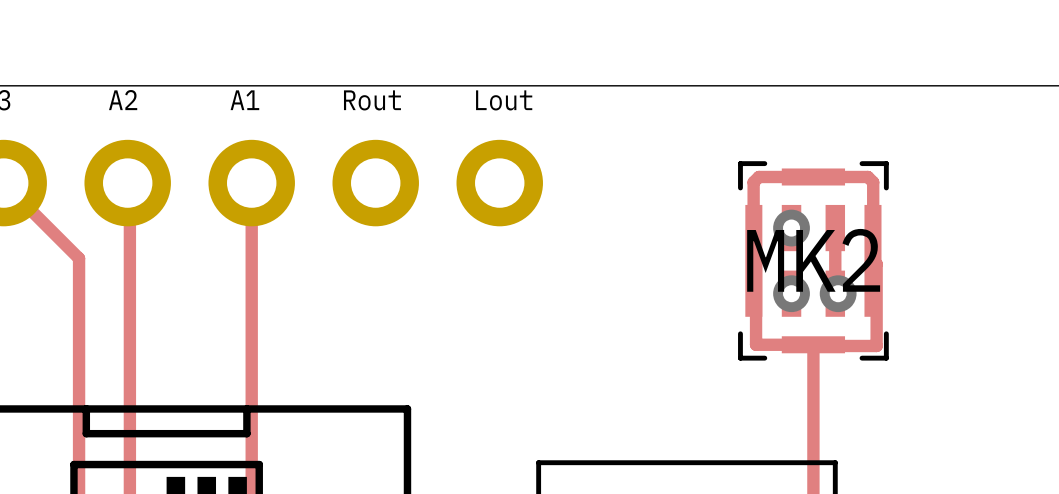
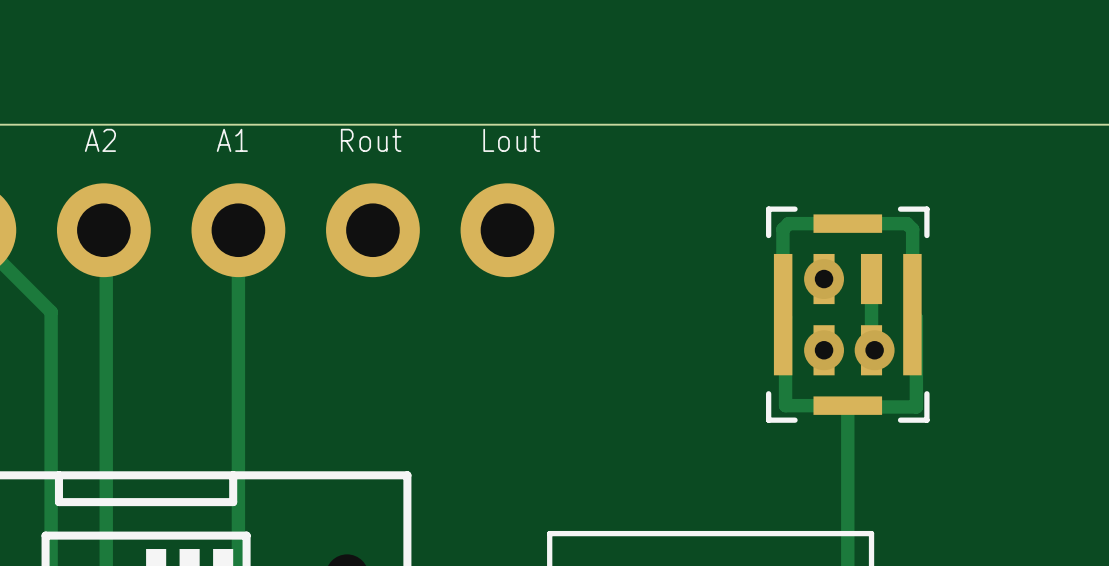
MK2 name: MK2 (813, 260) -> none

